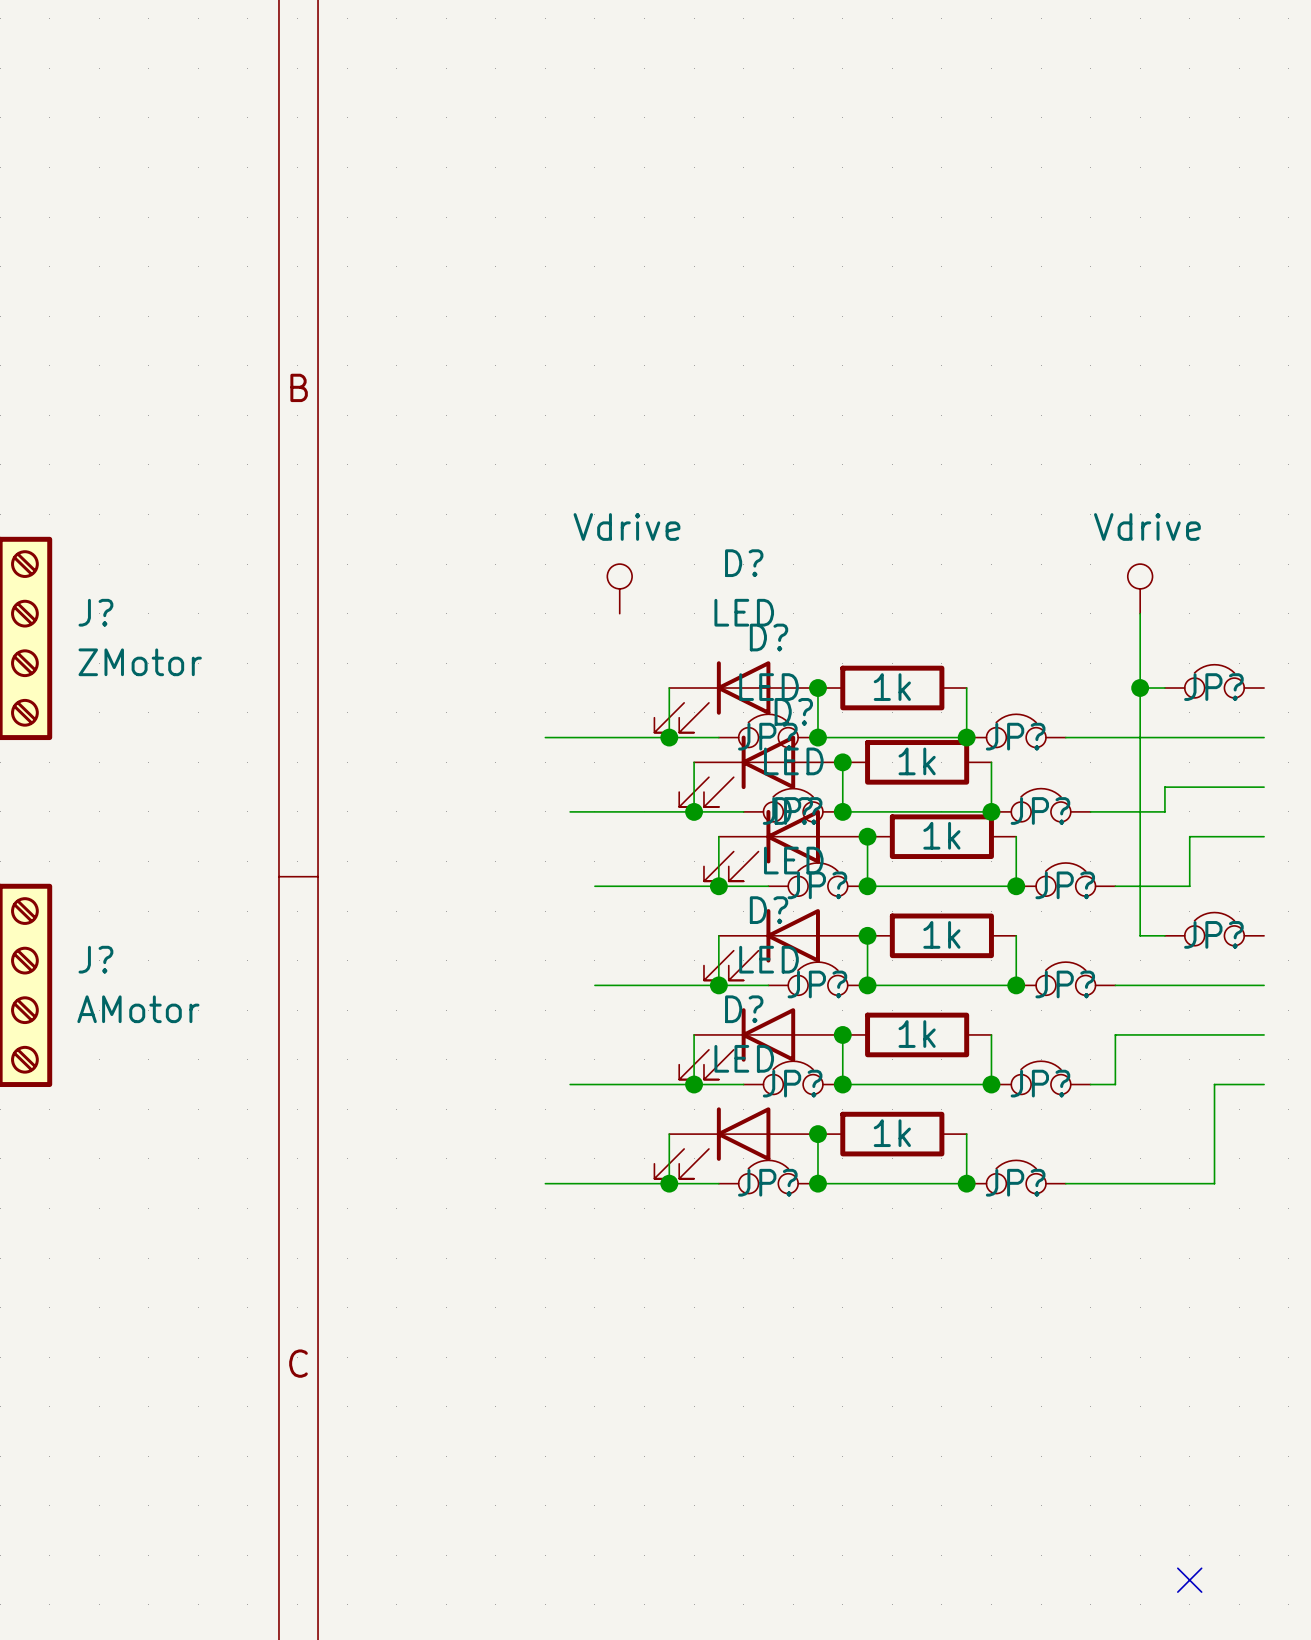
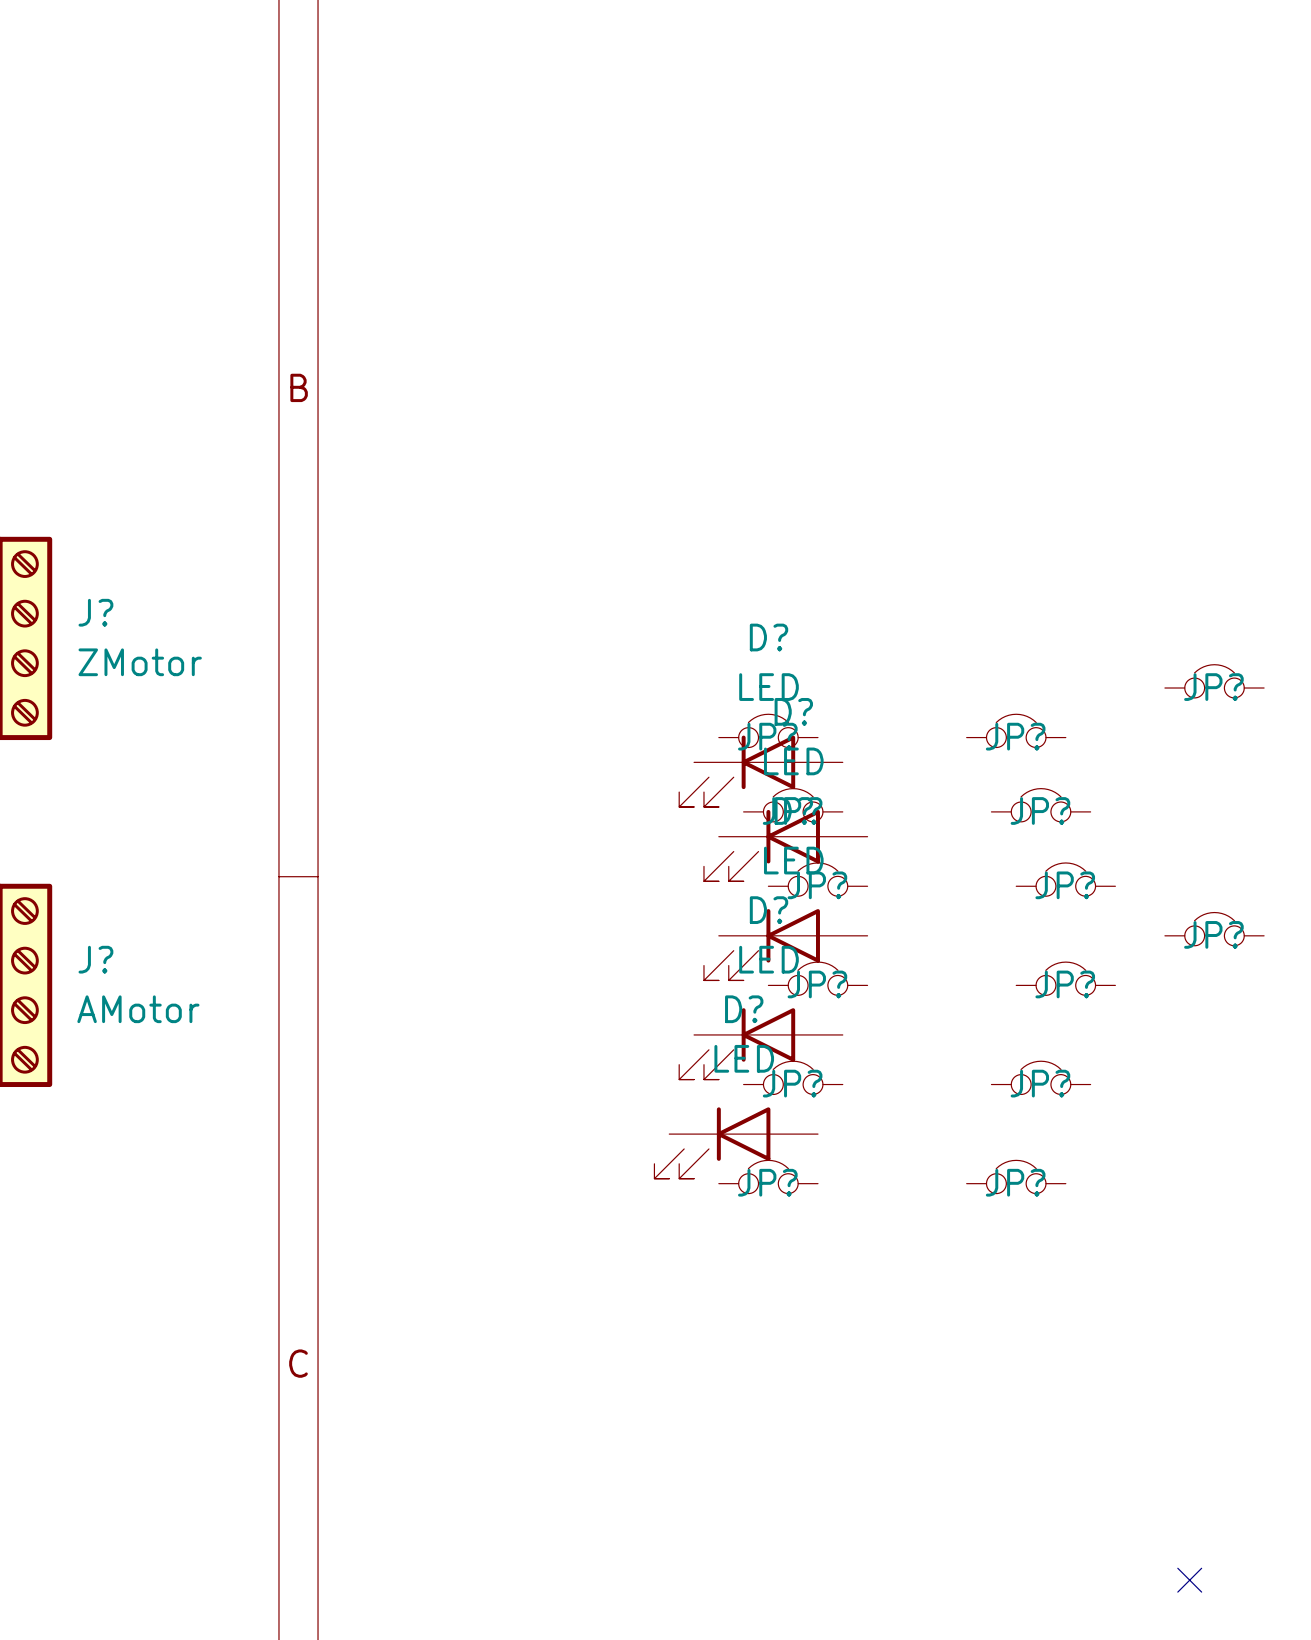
power symbol: Vdrive (619, 588) -> none
power symbol: Vdrive (1140, 588) -> none
wire: (1140, 613) (1140, 935) (1164, 935) -> none
wire: (669, 688) (669, 737) -> none
wire: (817, 688) (817, 737) (966, 737) (966, 688) -> none
junction: (817, 688) -> none
part: 1k (892, 688) -> none
wire: (1140, 688) (1164, 688) -> none
junction: (1140, 688) -> none
D?: LED (736, 696) -> none
wire: (545, 737) (718, 737) -> none
junction: (669, 737) -> none
junction: (817, 737) -> none
junction: (966, 737) -> none
wire: (1065, 737) (1264, 737) -> none
wire: (694, 762) (694, 811) -> none
wire: (842, 762) (842, 811) (991, 811) (991, 762) -> none
junction: (842, 762) -> none
part: 1k (917, 762) -> none
wire: (1264, 787) (1164, 787) (1164, 811) (1090, 811) -> none
wire: (570, 811) (743, 811) -> none
junction: (694, 811) -> none
junction: (842, 811) -> none
junction: (991, 811) -> none
wire: (718, 836) (718, 886) -> none
wire: (867, 836) (867, 886) (1016, 886) (1016, 836) -> none
junction: (867, 836) -> none
part: 1k (941, 836) -> none
wire: (1264, 836) (1189, 836) (1189, 886) (1115, 886) -> none
wire: (594, 886) (768, 886) -> none
junction: (718, 886) -> none
junction: (867, 886) -> none
junction: (1016, 886) -> none
wire: (718, 935) (718, 985) -> none
wire: (867, 935) (867, 985) (1016, 985) (1016, 935) -> none
junction: (867, 935) -> none
part: 1k (941, 935) -> none
wire: (594, 985) (768, 985) -> none
junction: (718, 985) -> none
junction: (867, 985) -> none
junction: (1016, 985) -> none
wire: (1115, 985) (1264, 985) -> none
wire: (694, 1034) (694, 1084) -> none
wire: (842, 1034) (842, 1084) (991, 1084) (991, 1034) -> none
junction: (842, 1034) -> none
part: 1k (917, 1034) -> none
wire: (1264, 1034) (1115, 1034) (1115, 1084) (1090, 1084) -> none
wire: (570, 1084) (743, 1084) -> none
junction: (694, 1084) -> none
junction: (842, 1084) -> none
junction: (991, 1084) -> none
wire: (1264, 1084) (1214, 1084) (1214, 1183) (1065, 1183) -> none
wire: (669, 1134) (669, 1183) -> none
wire: (817, 1134) (817, 1183) (966, 1183) (966, 1134) -> none
junction: (817, 1134) -> none
part: 1k (892, 1134) -> none
wire: (545, 1183) (718, 1183) -> none
junction: (669, 1183) -> none
junction: (817, 1183) -> none
junction: (966, 1183) -> none

